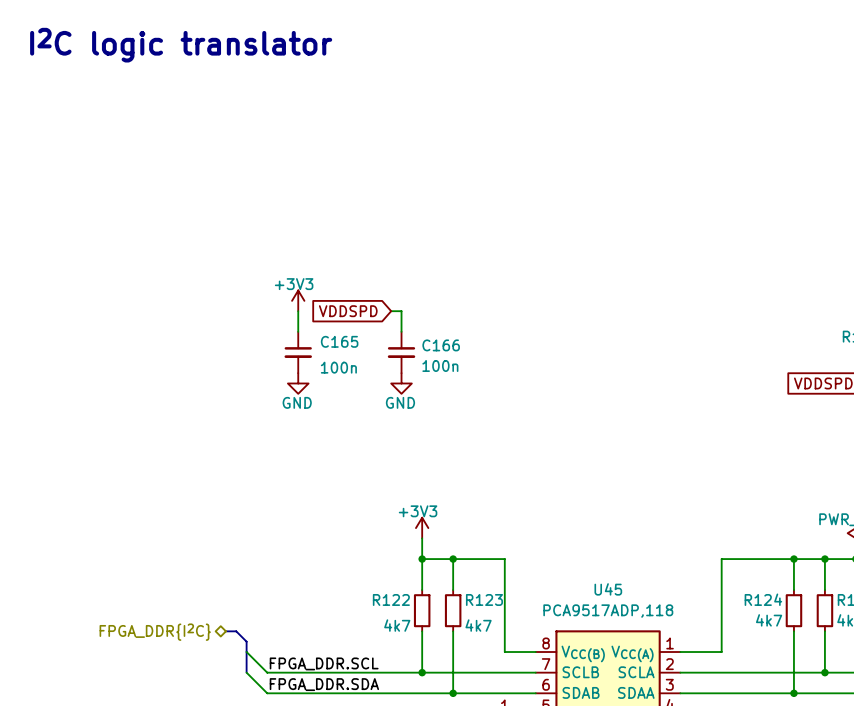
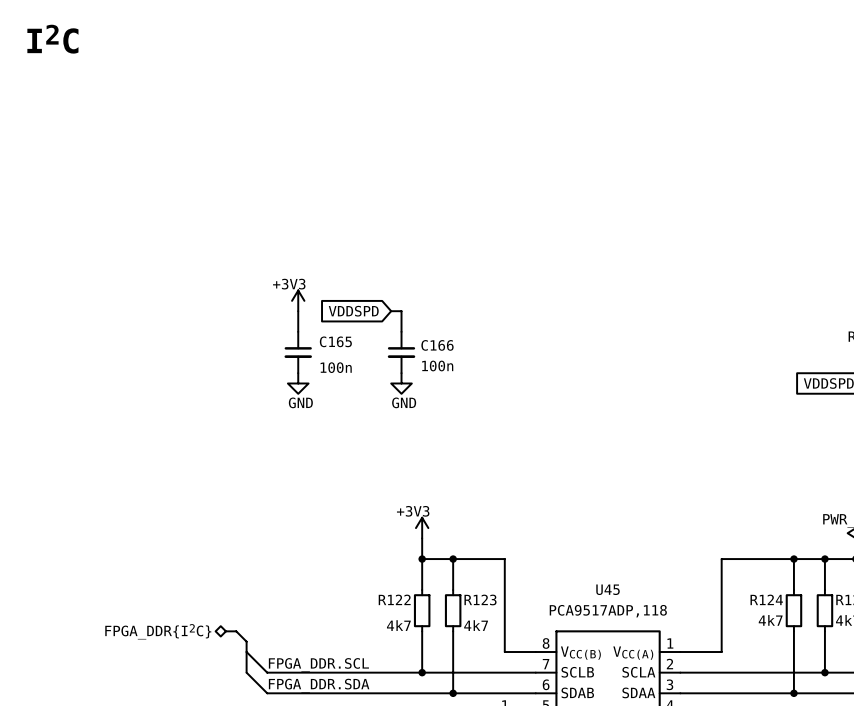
text: I2C logic translator (181, 45) -> I2C (52, 39)

